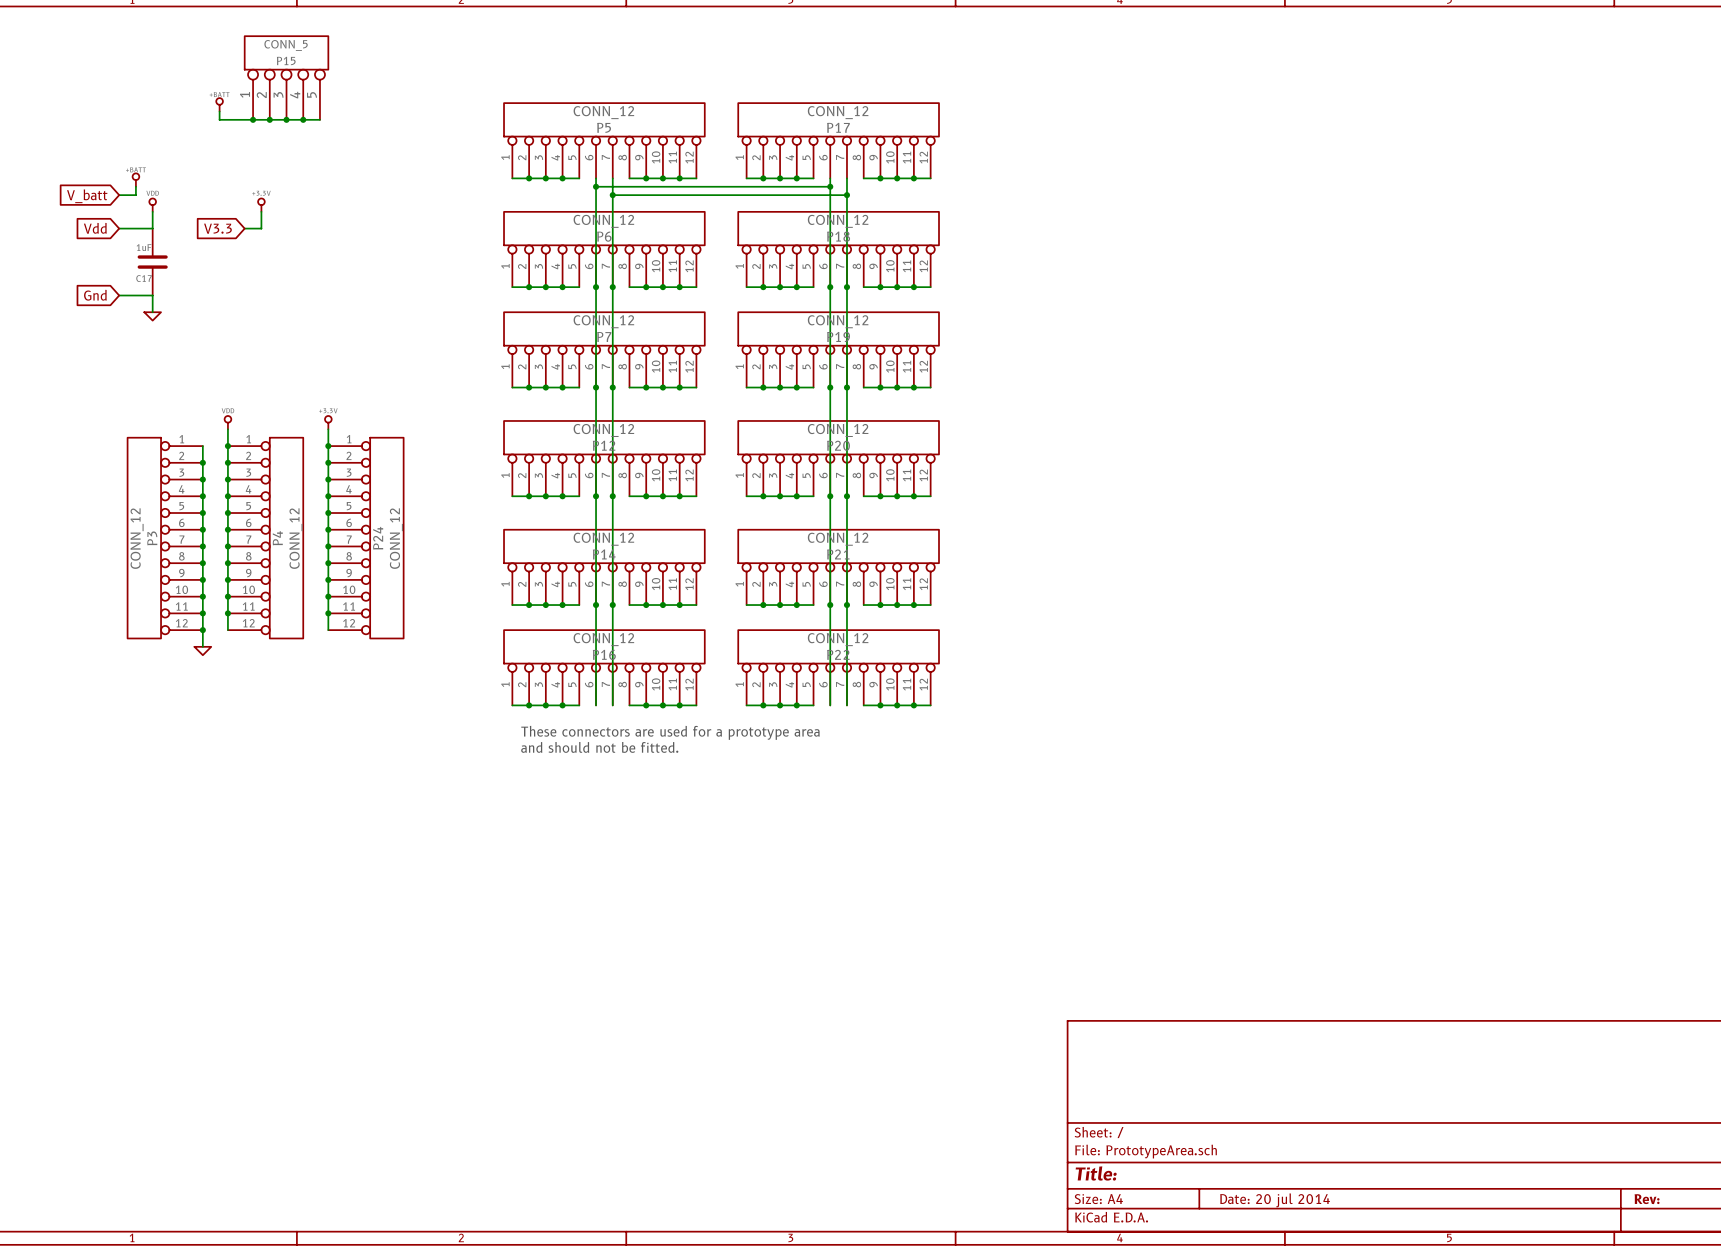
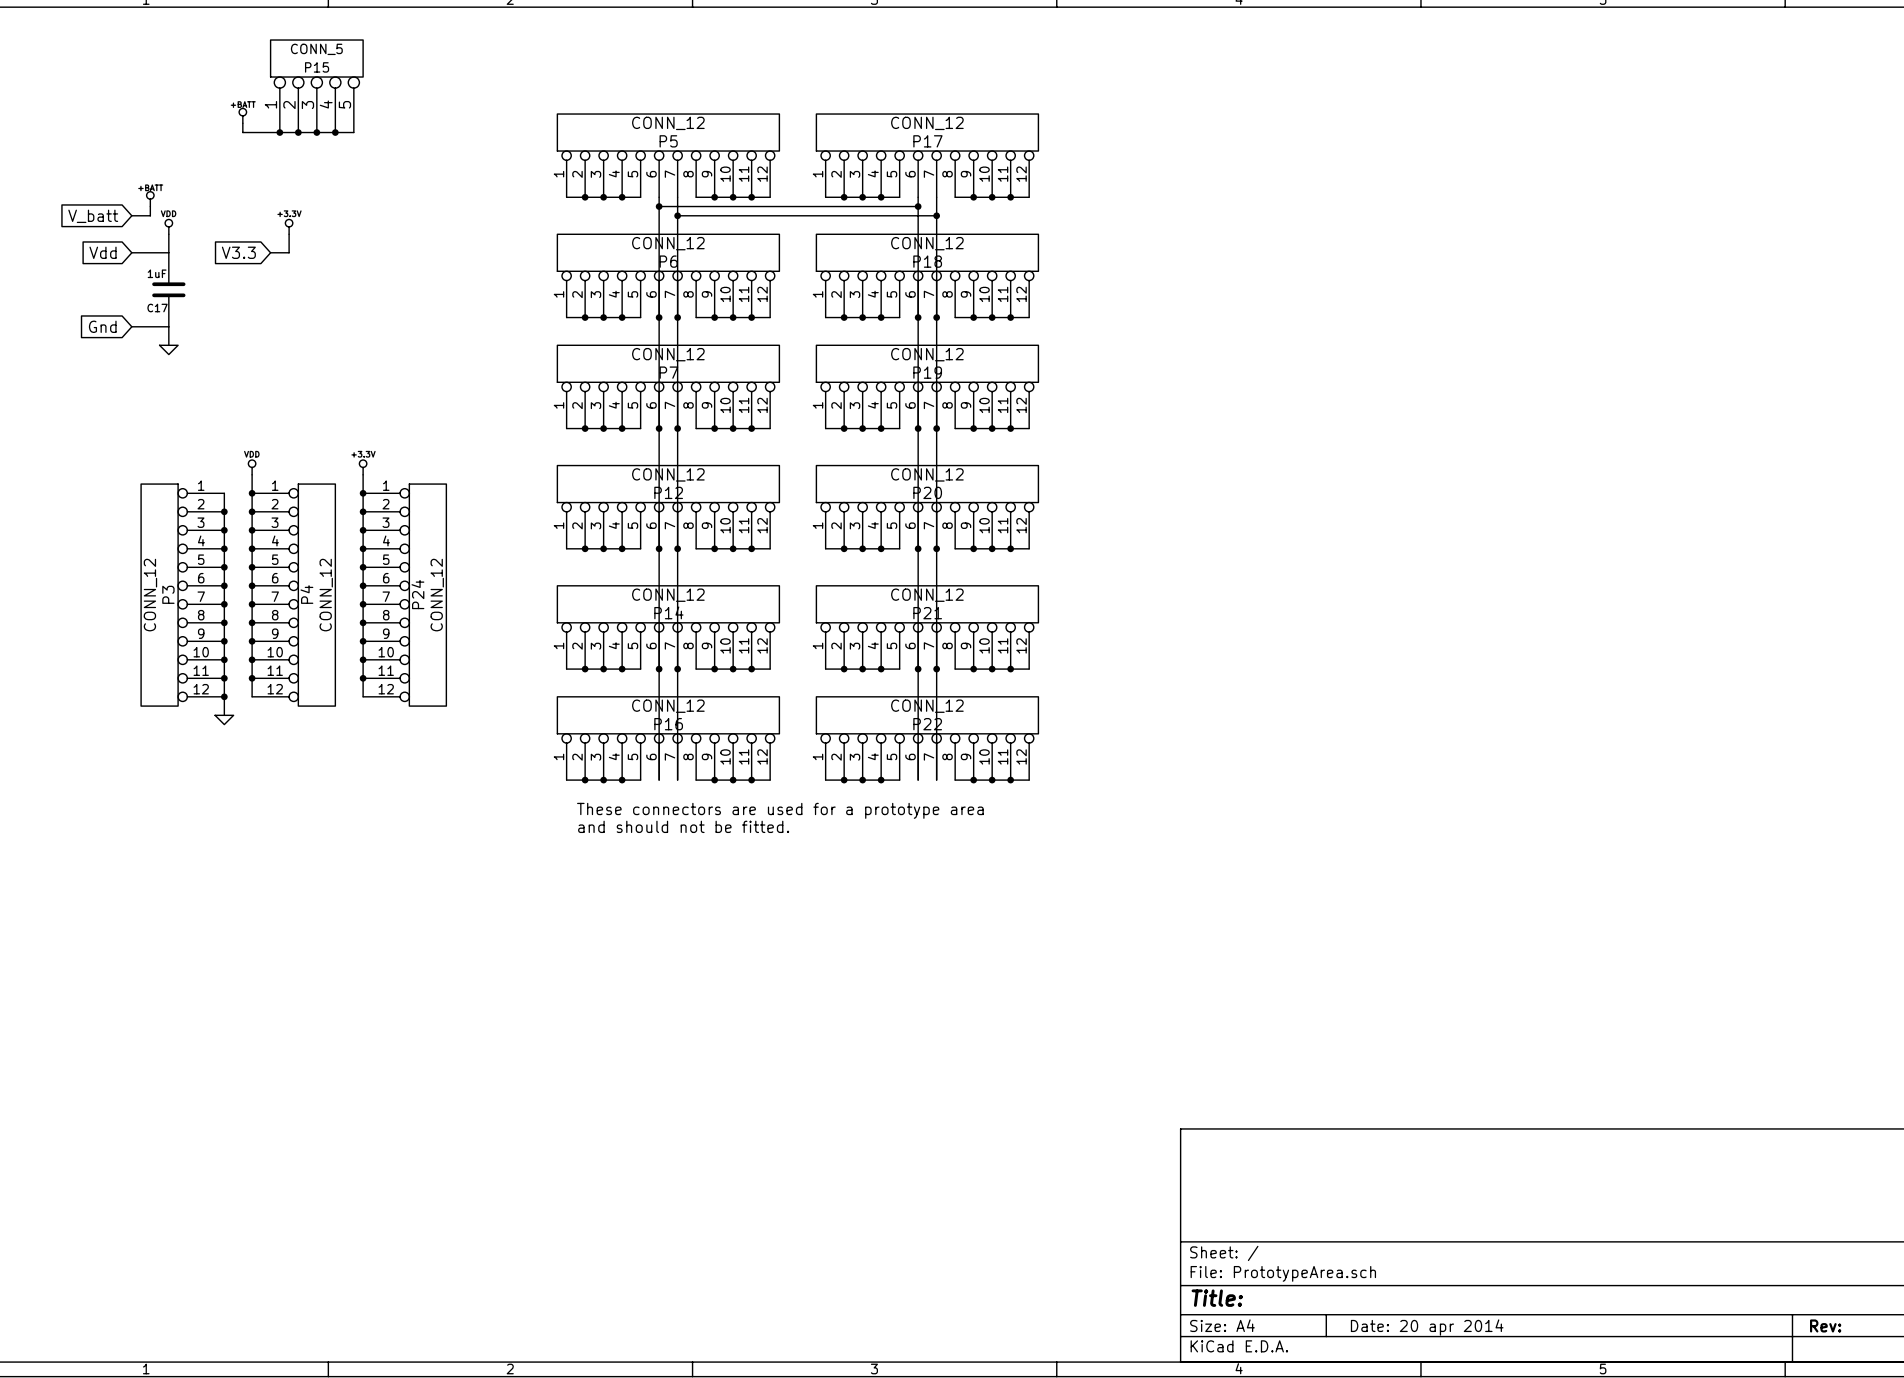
title block: Date: 20 jul 2014 (1275, 1200) -> Date: 20 apr 2014 (1427, 1327)

